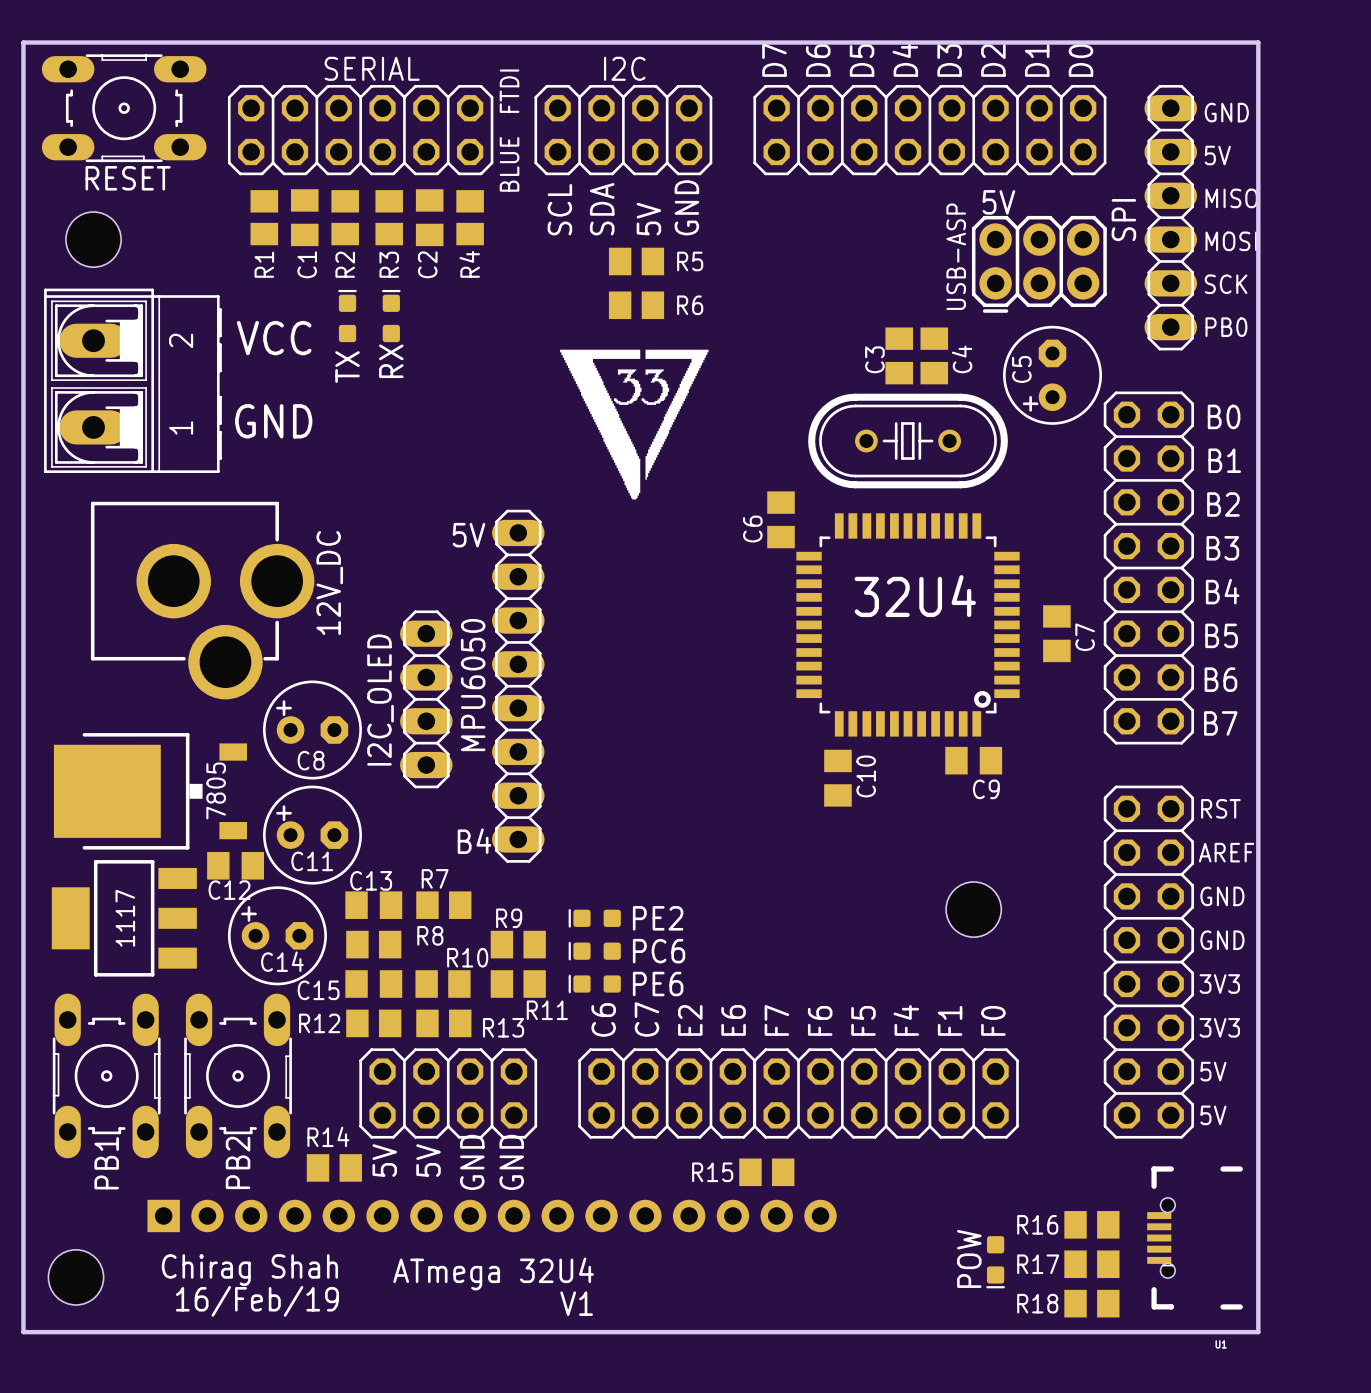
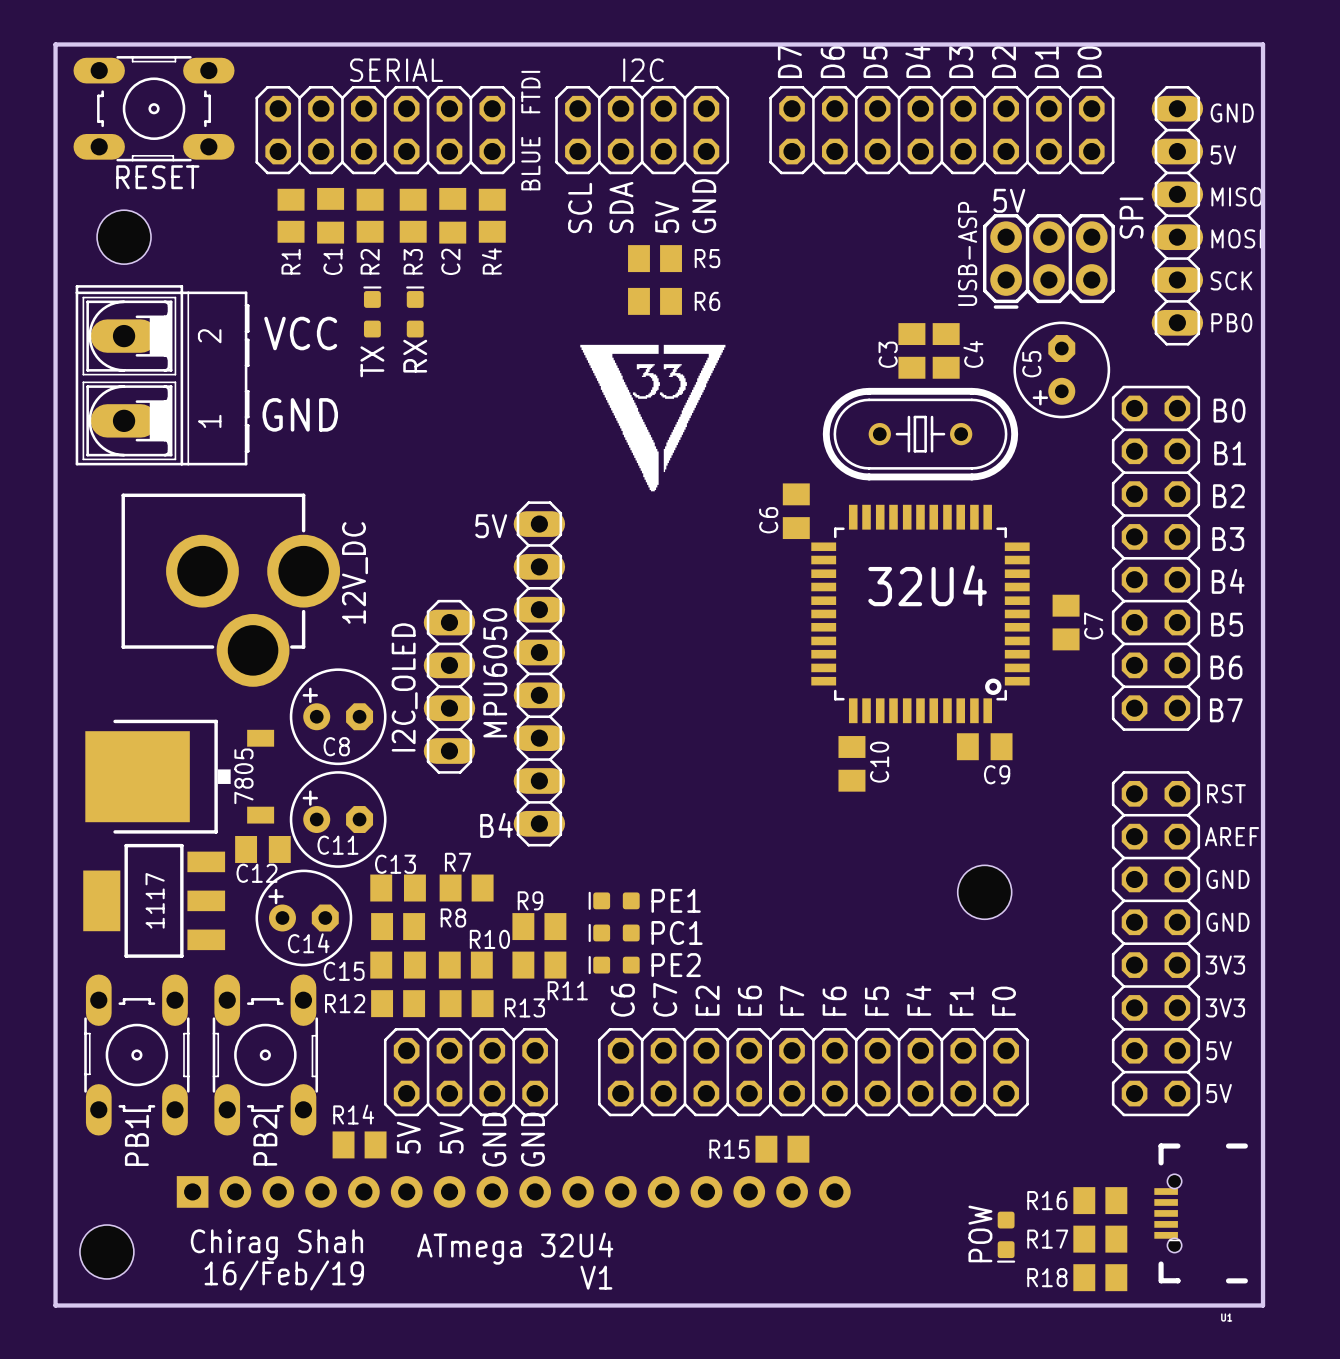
PE2 name: PE2 (658, 918) -> PE1 (676, 900)
PC6 name: PC6 (659, 951) -> PC1 (677, 932)
PE6 name: PE6 (658, 984) -> PE2 (676, 965)

